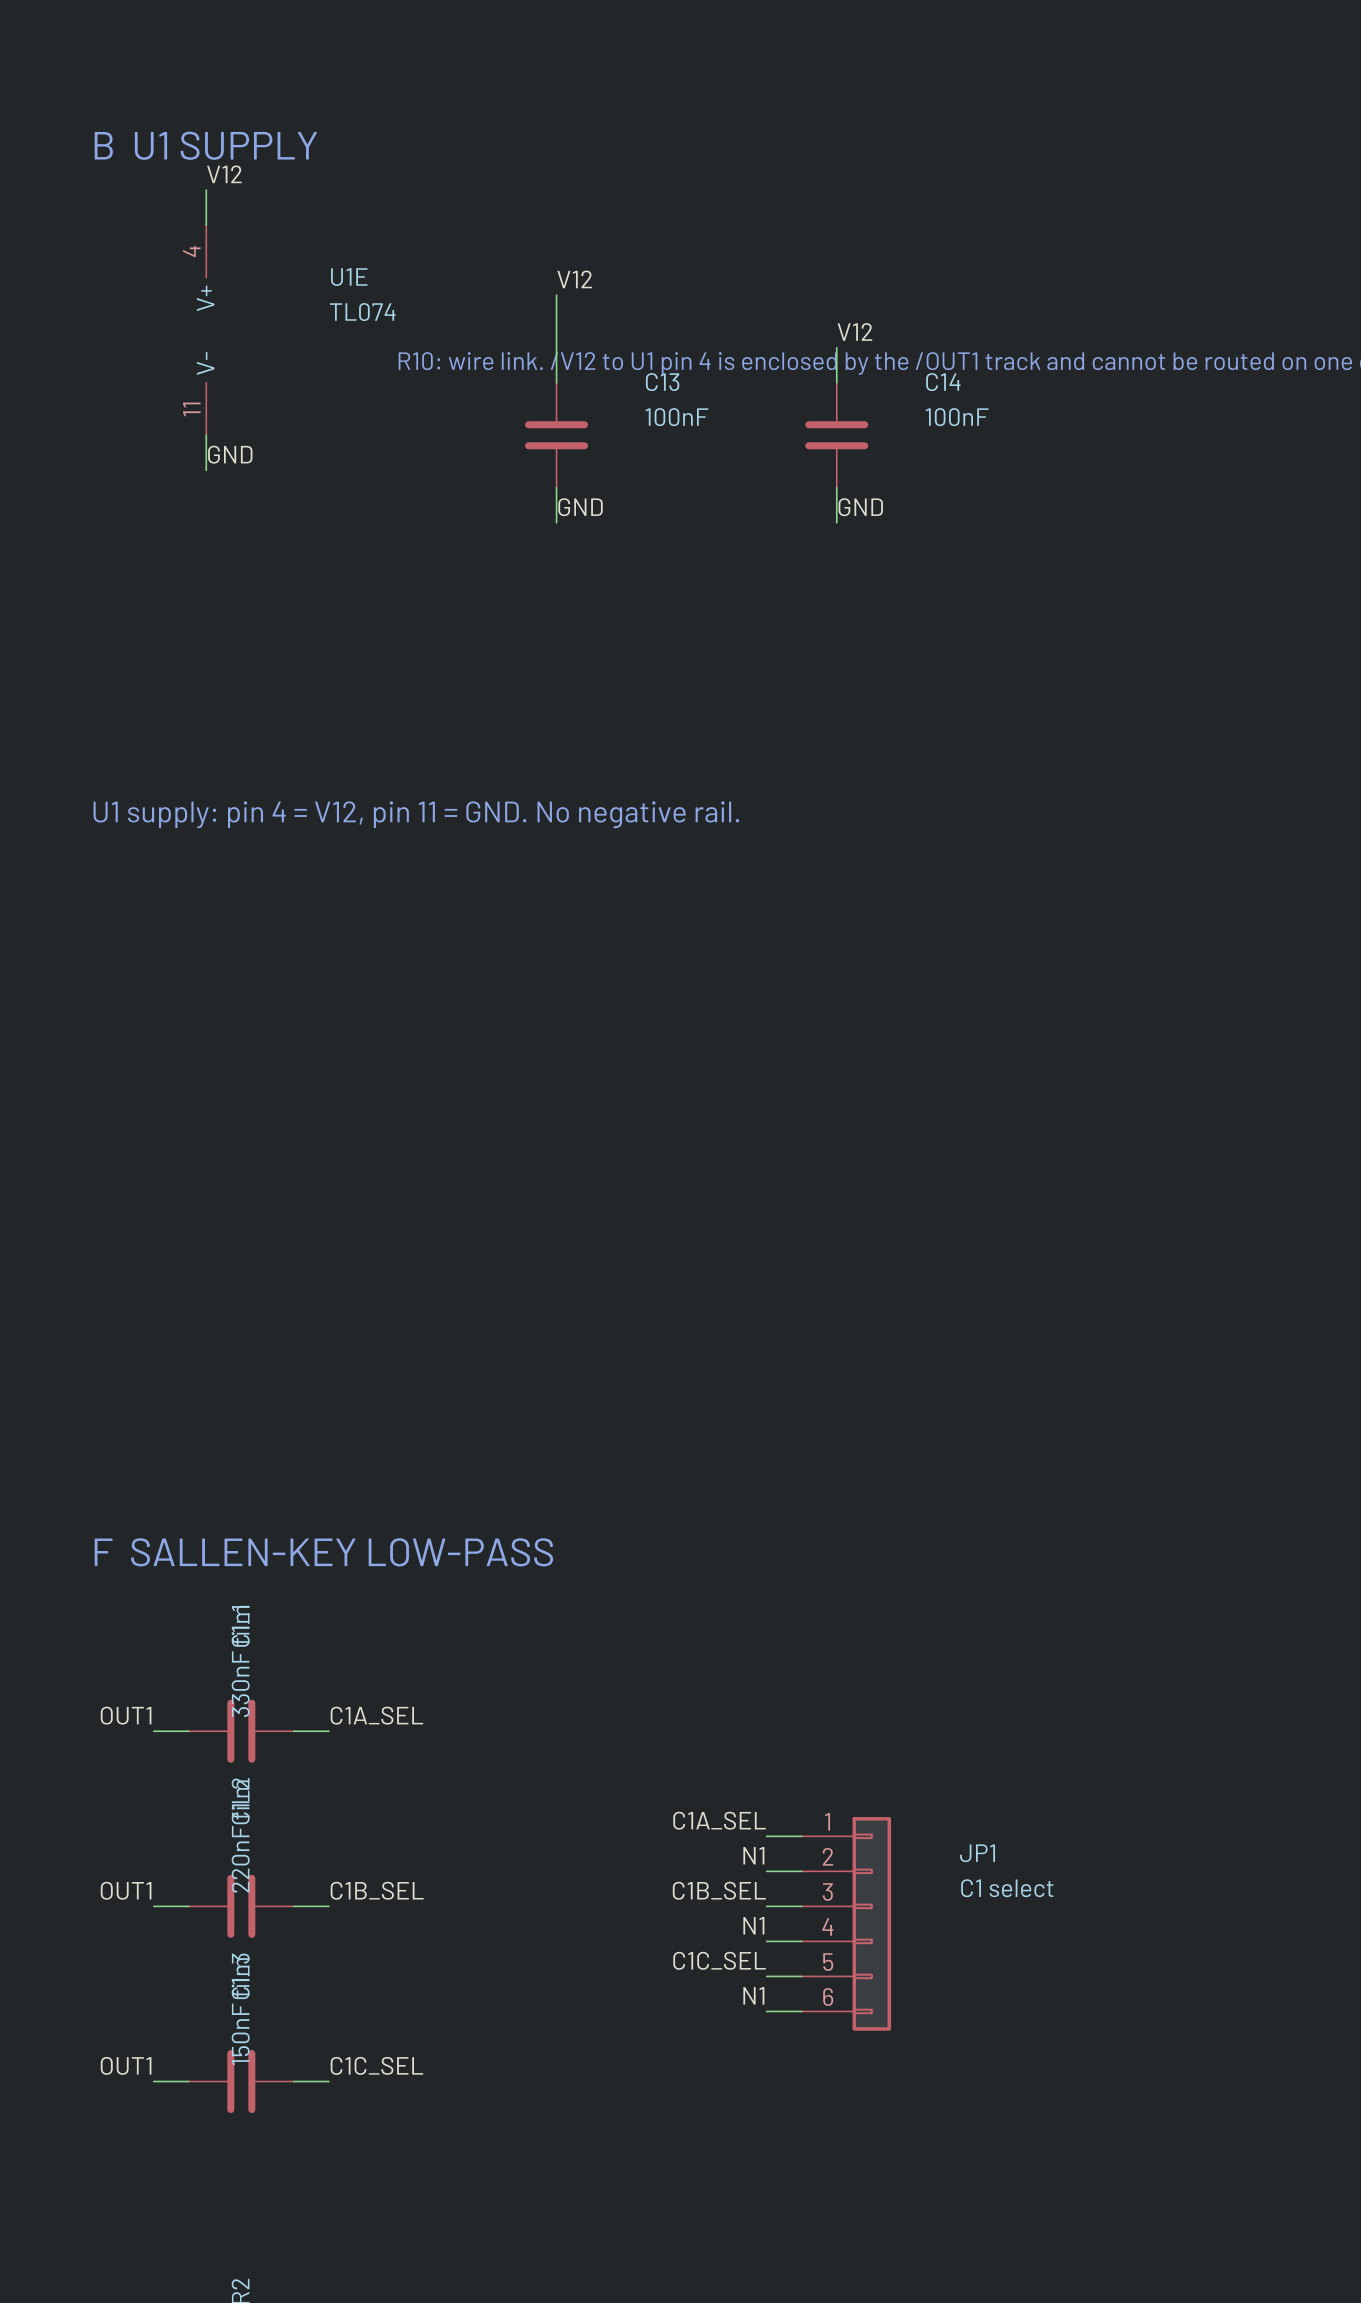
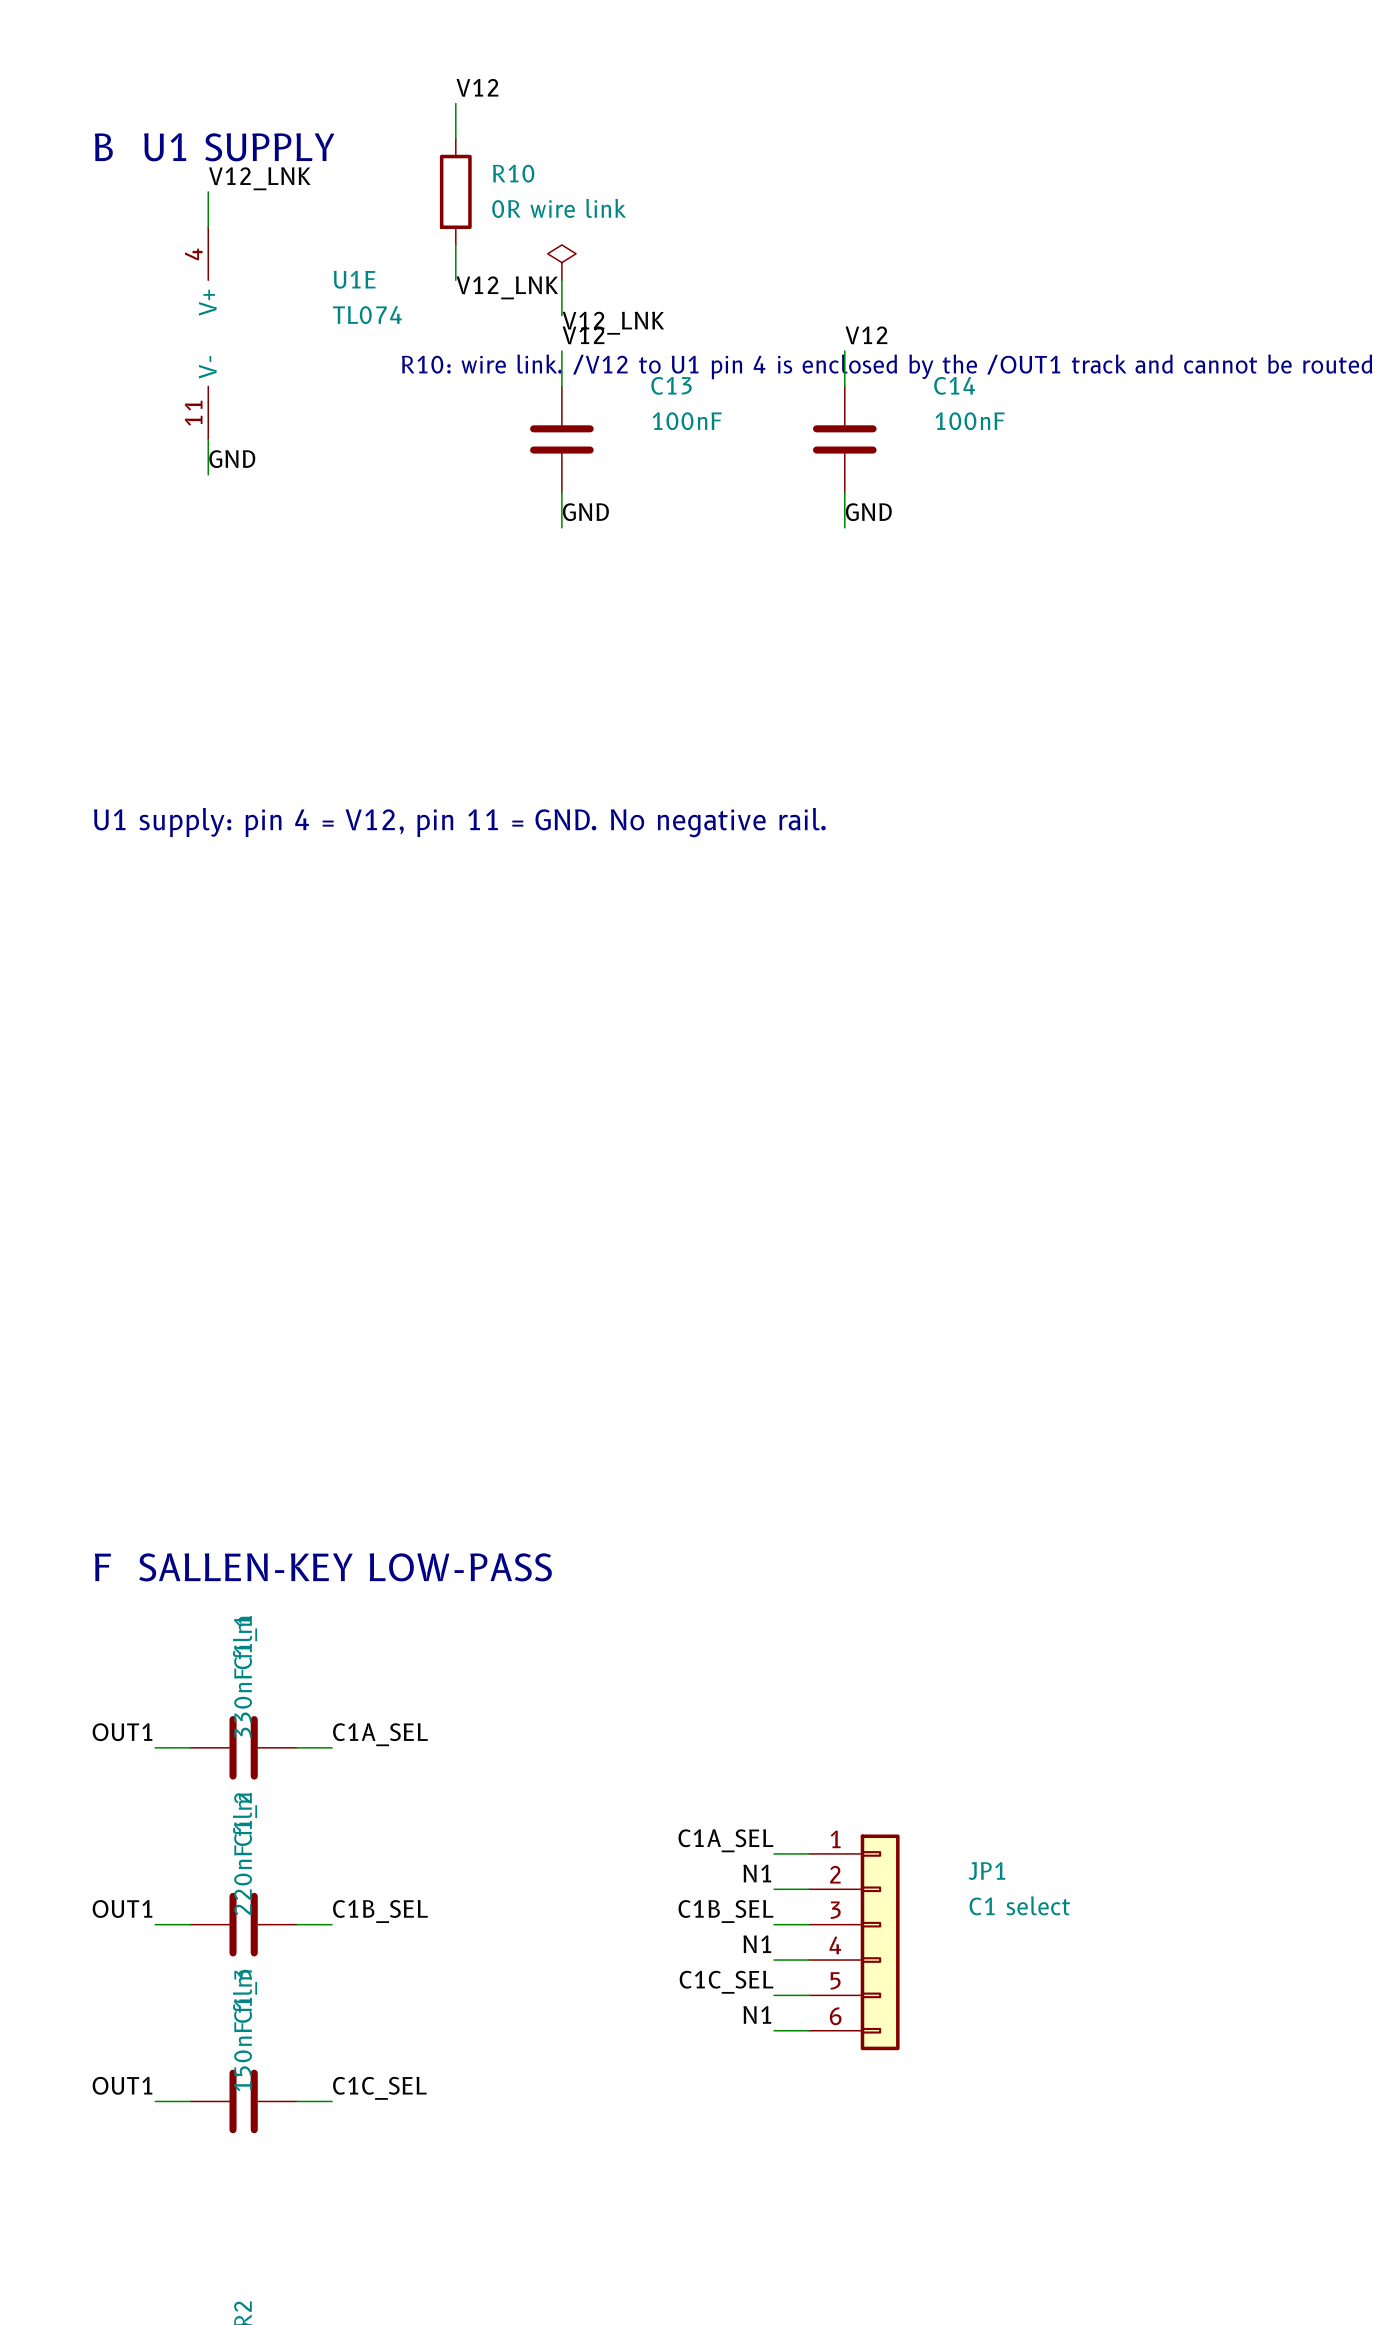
label: none -> V12 (477, 87)
wire: none -> (455, 103) (455, 138)
label: V12 (224, 174) -> V12_LNK (259, 178)
R10: none -> 0R wire link (455, 191)
power symbol: none -> (561, 262)
wire: none -> (561, 280) (561, 297)
label position: V12 (574, 279) -> V12 (583, 335)
label: none -> V12_LNK (507, 287)
wire: (556, 312) (556, 347) -> (455, 244) (455, 280)
label: none -> V12_LNK (613, 323)

